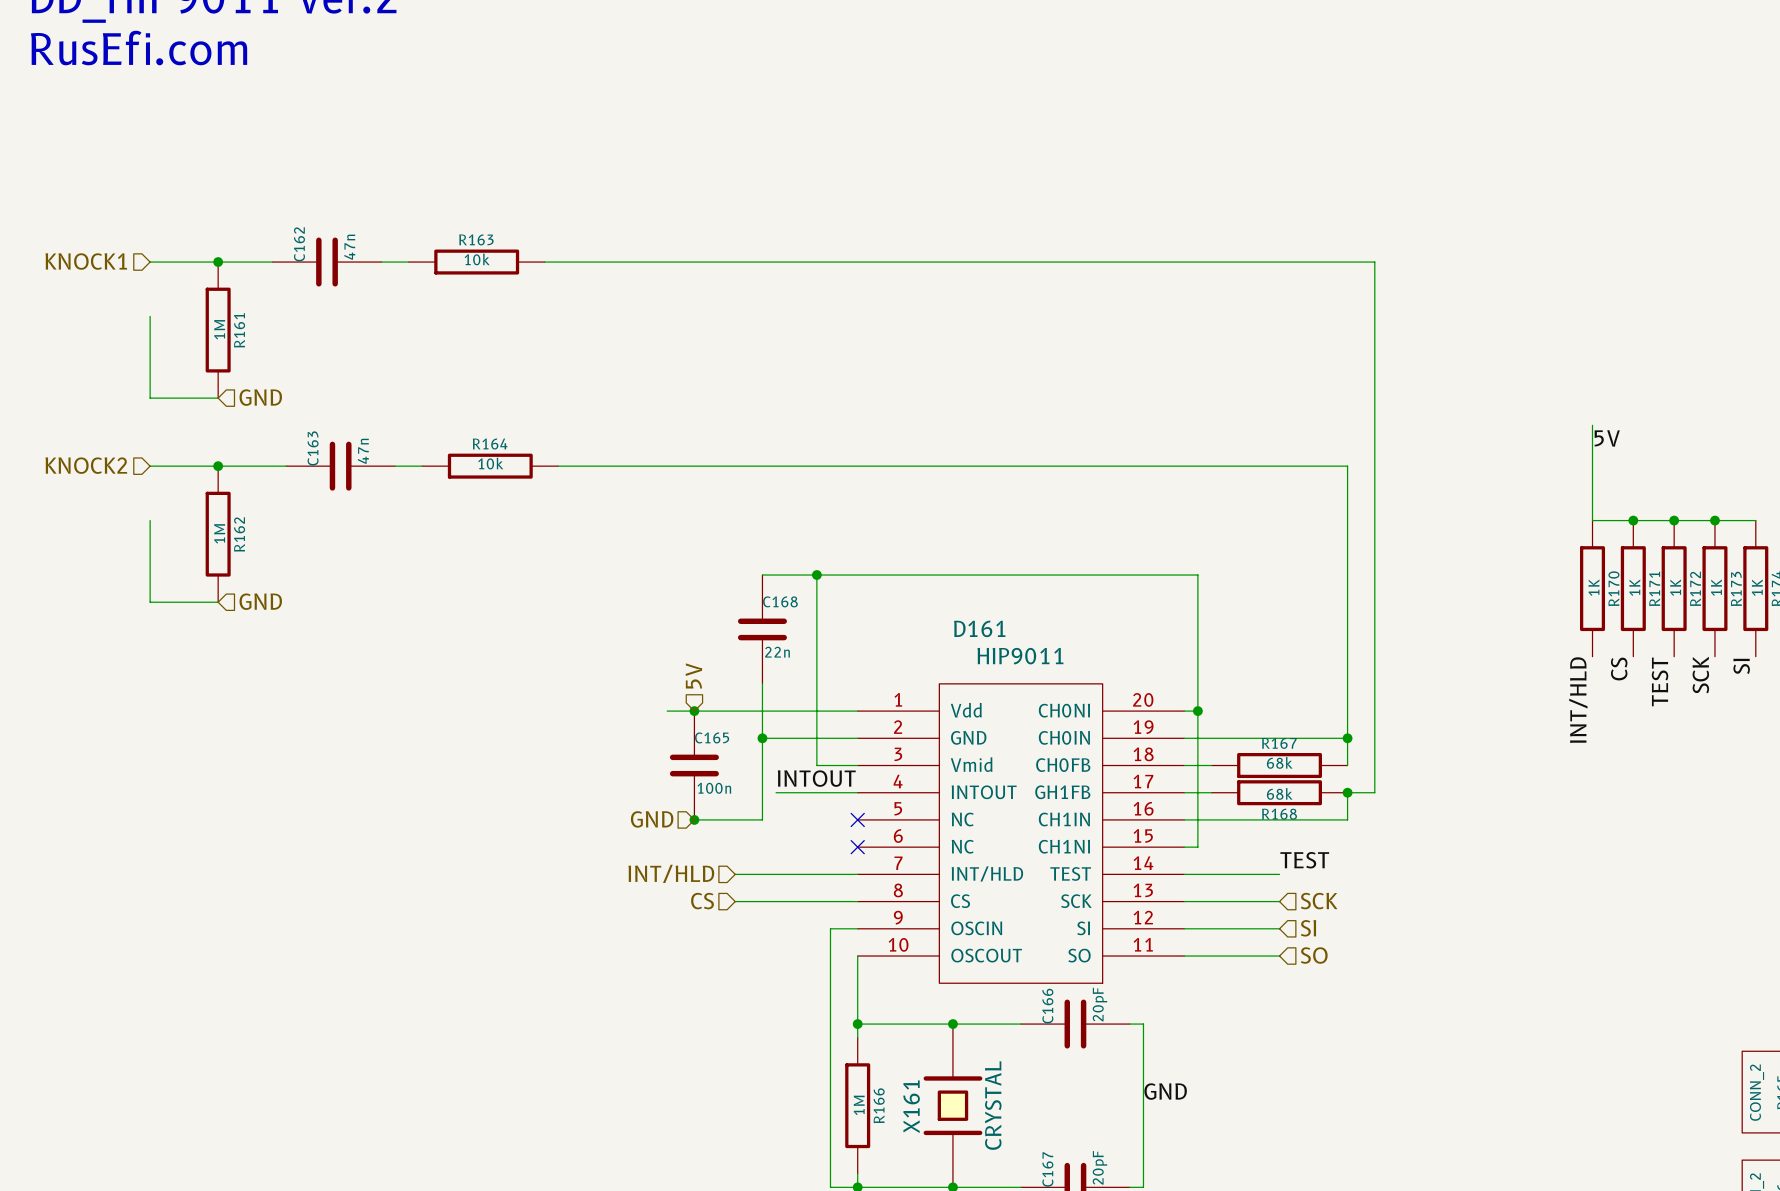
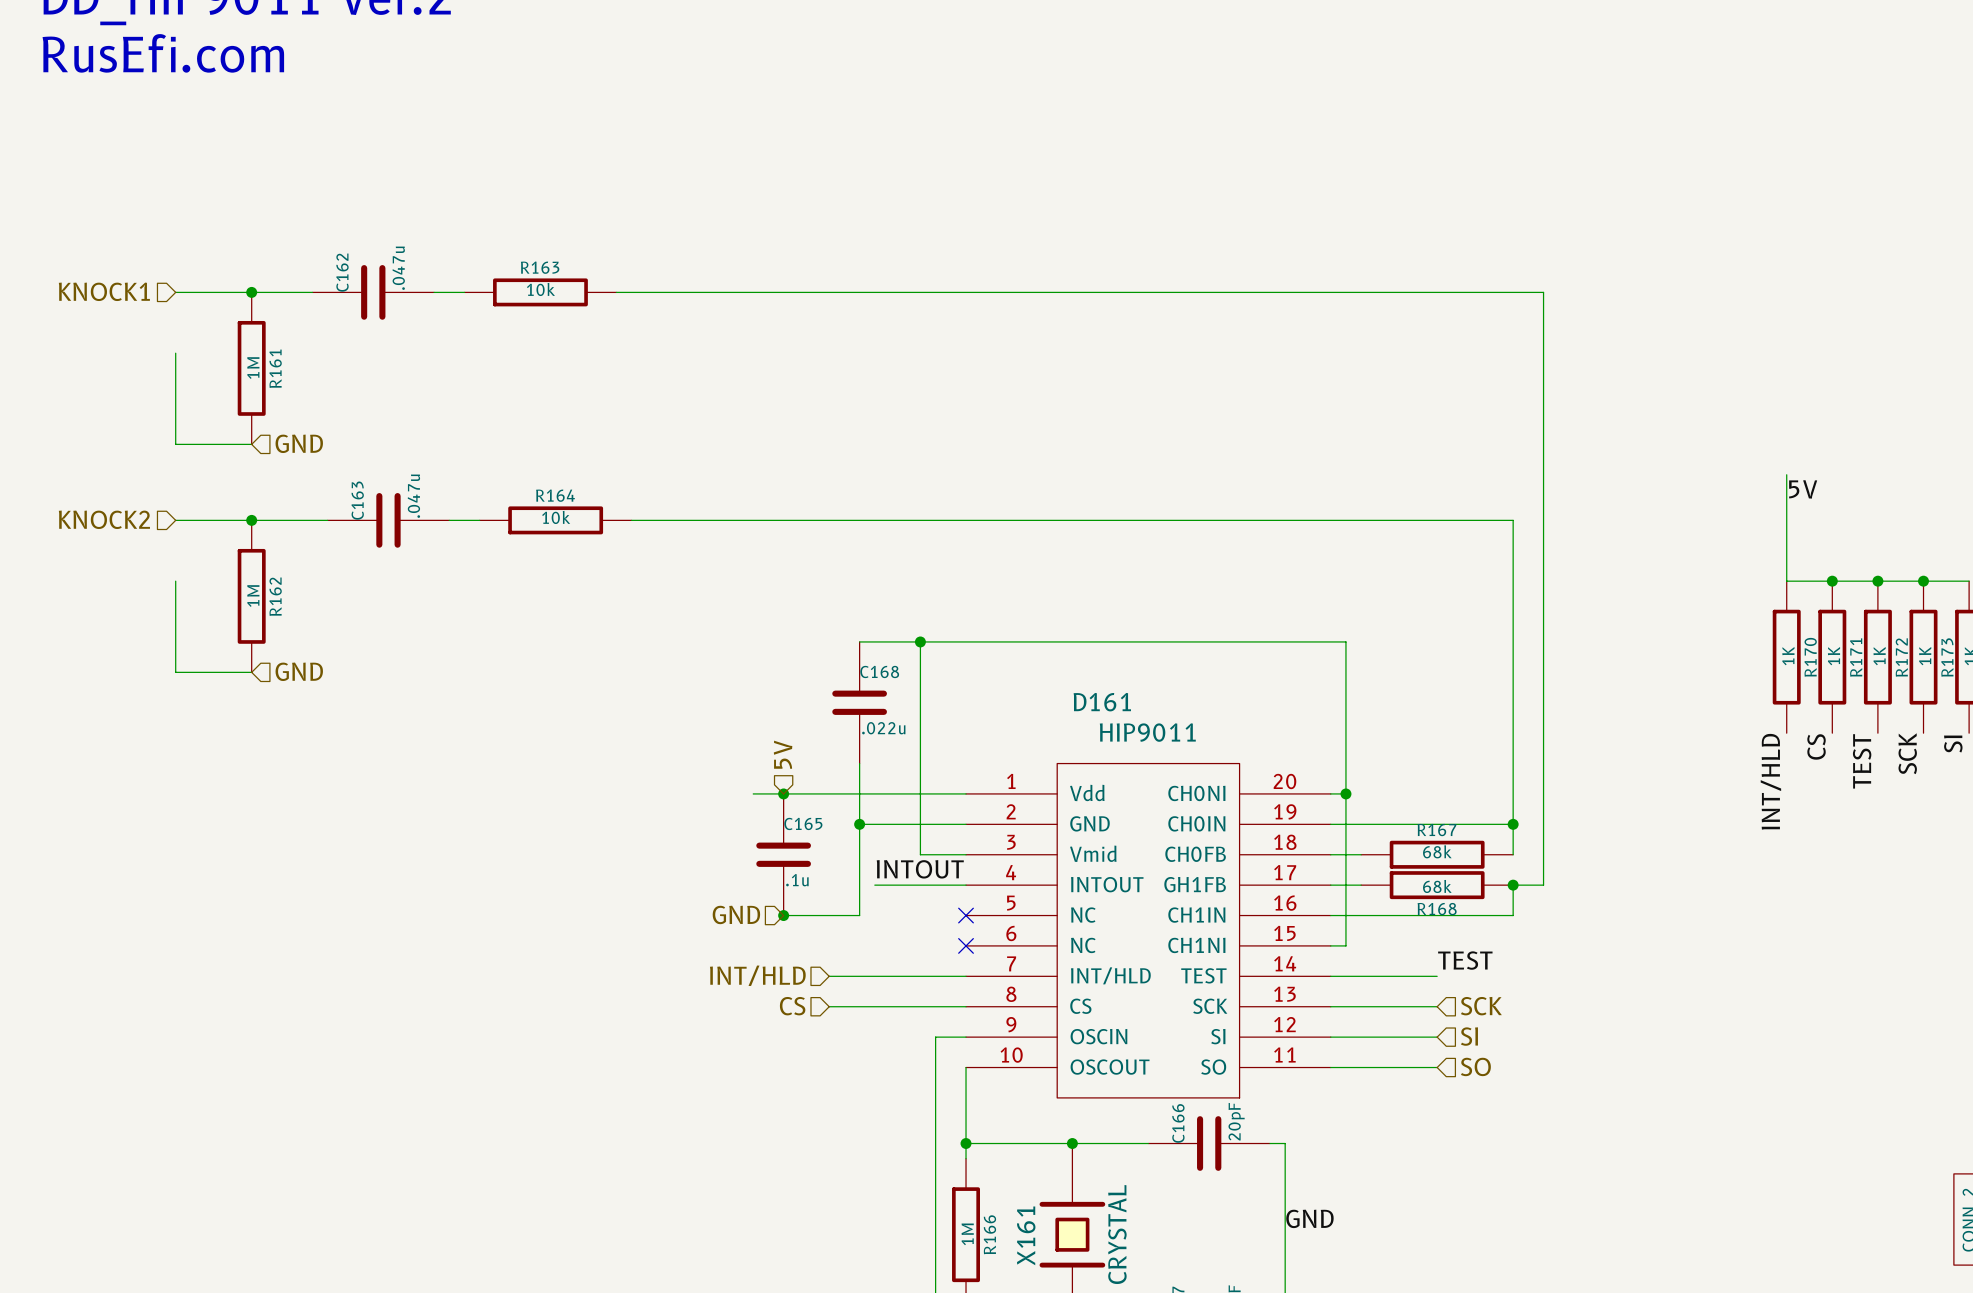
C162 value: 47n (349, 247) -> .047u (398, 268)
C163 value: 47n (363, 451) -> .047u (413, 496)
C168 value: 22n (777, 652) -> .022u (883, 728)
C165 value: 100n (714, 788) -> .1u (797, 880)

